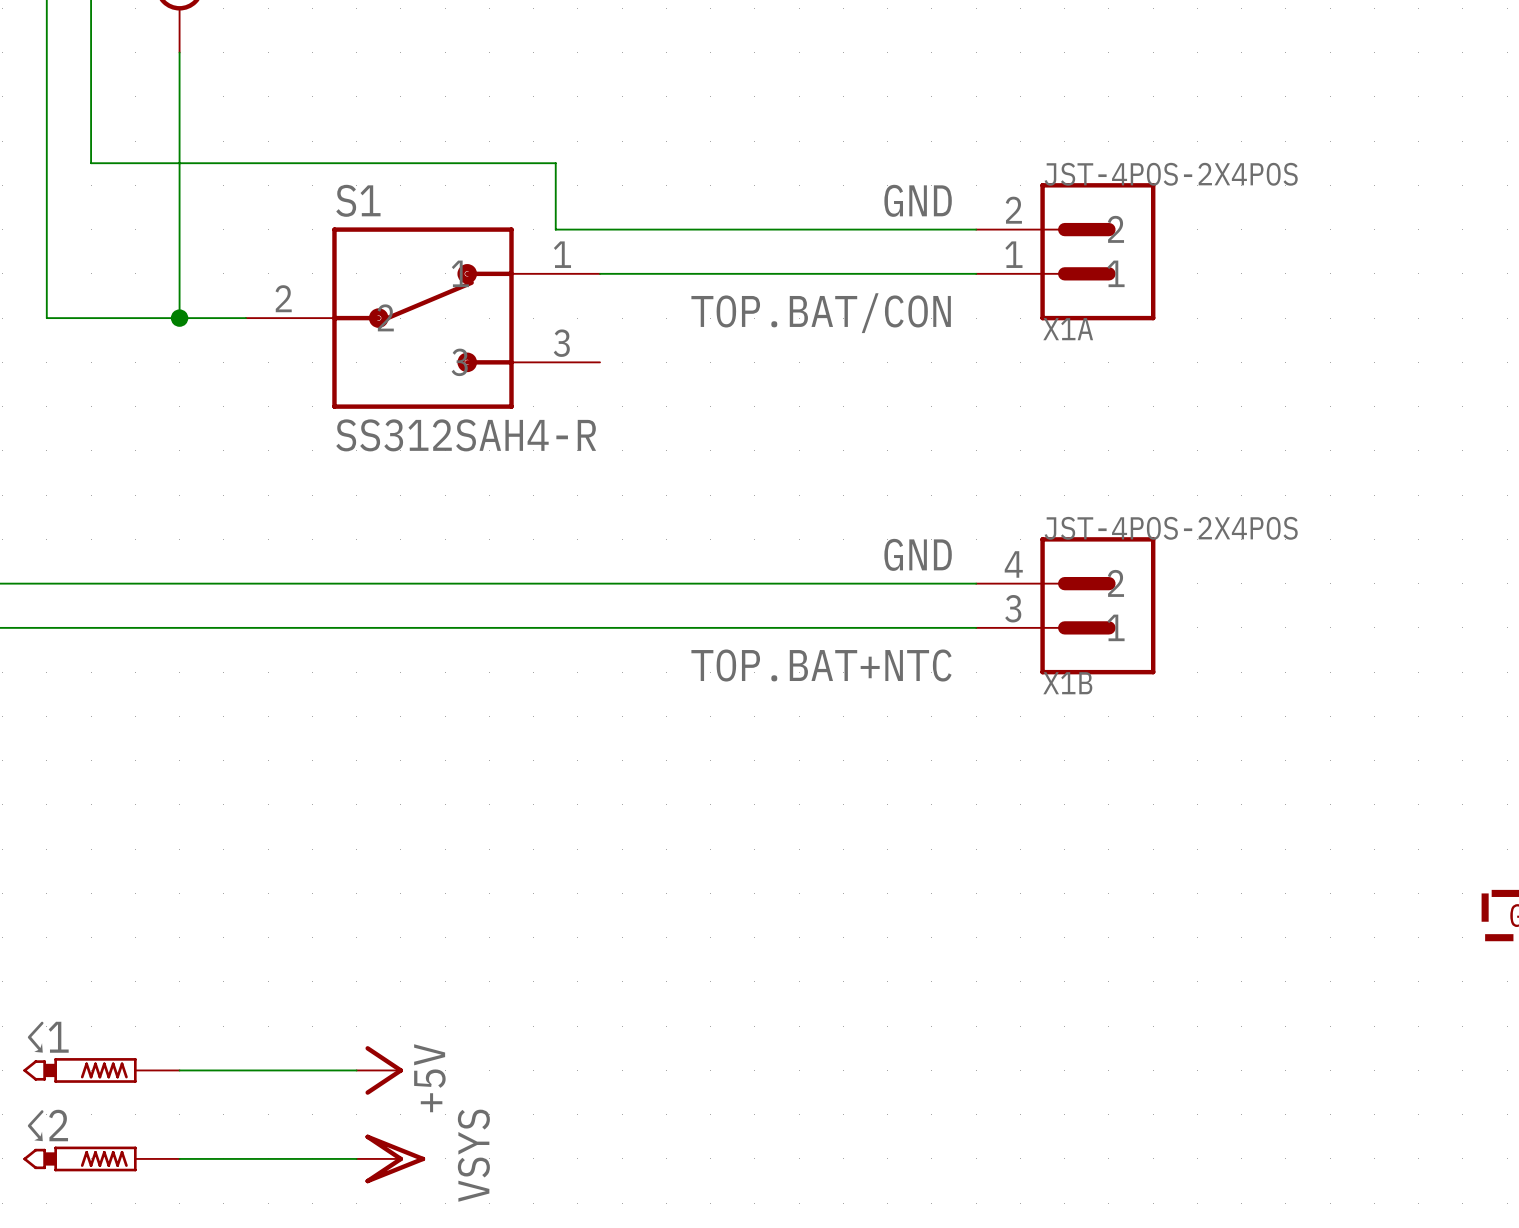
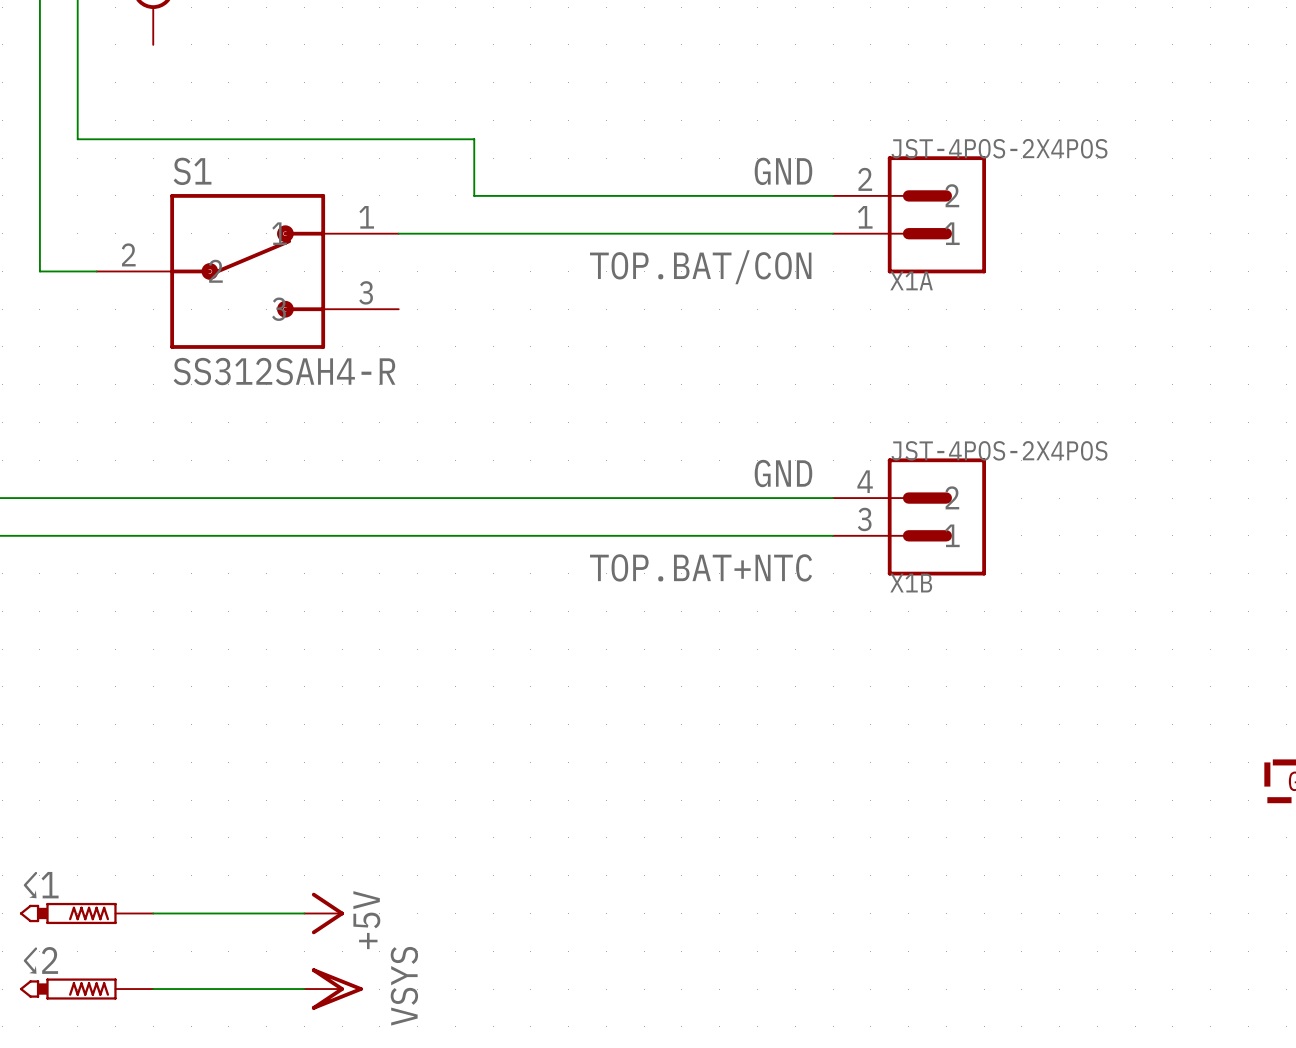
wire: (179, 52) (179, 318) -> none
junction: (179, 318) -> none
S1 position: (422, 318) -> (247, 271)

